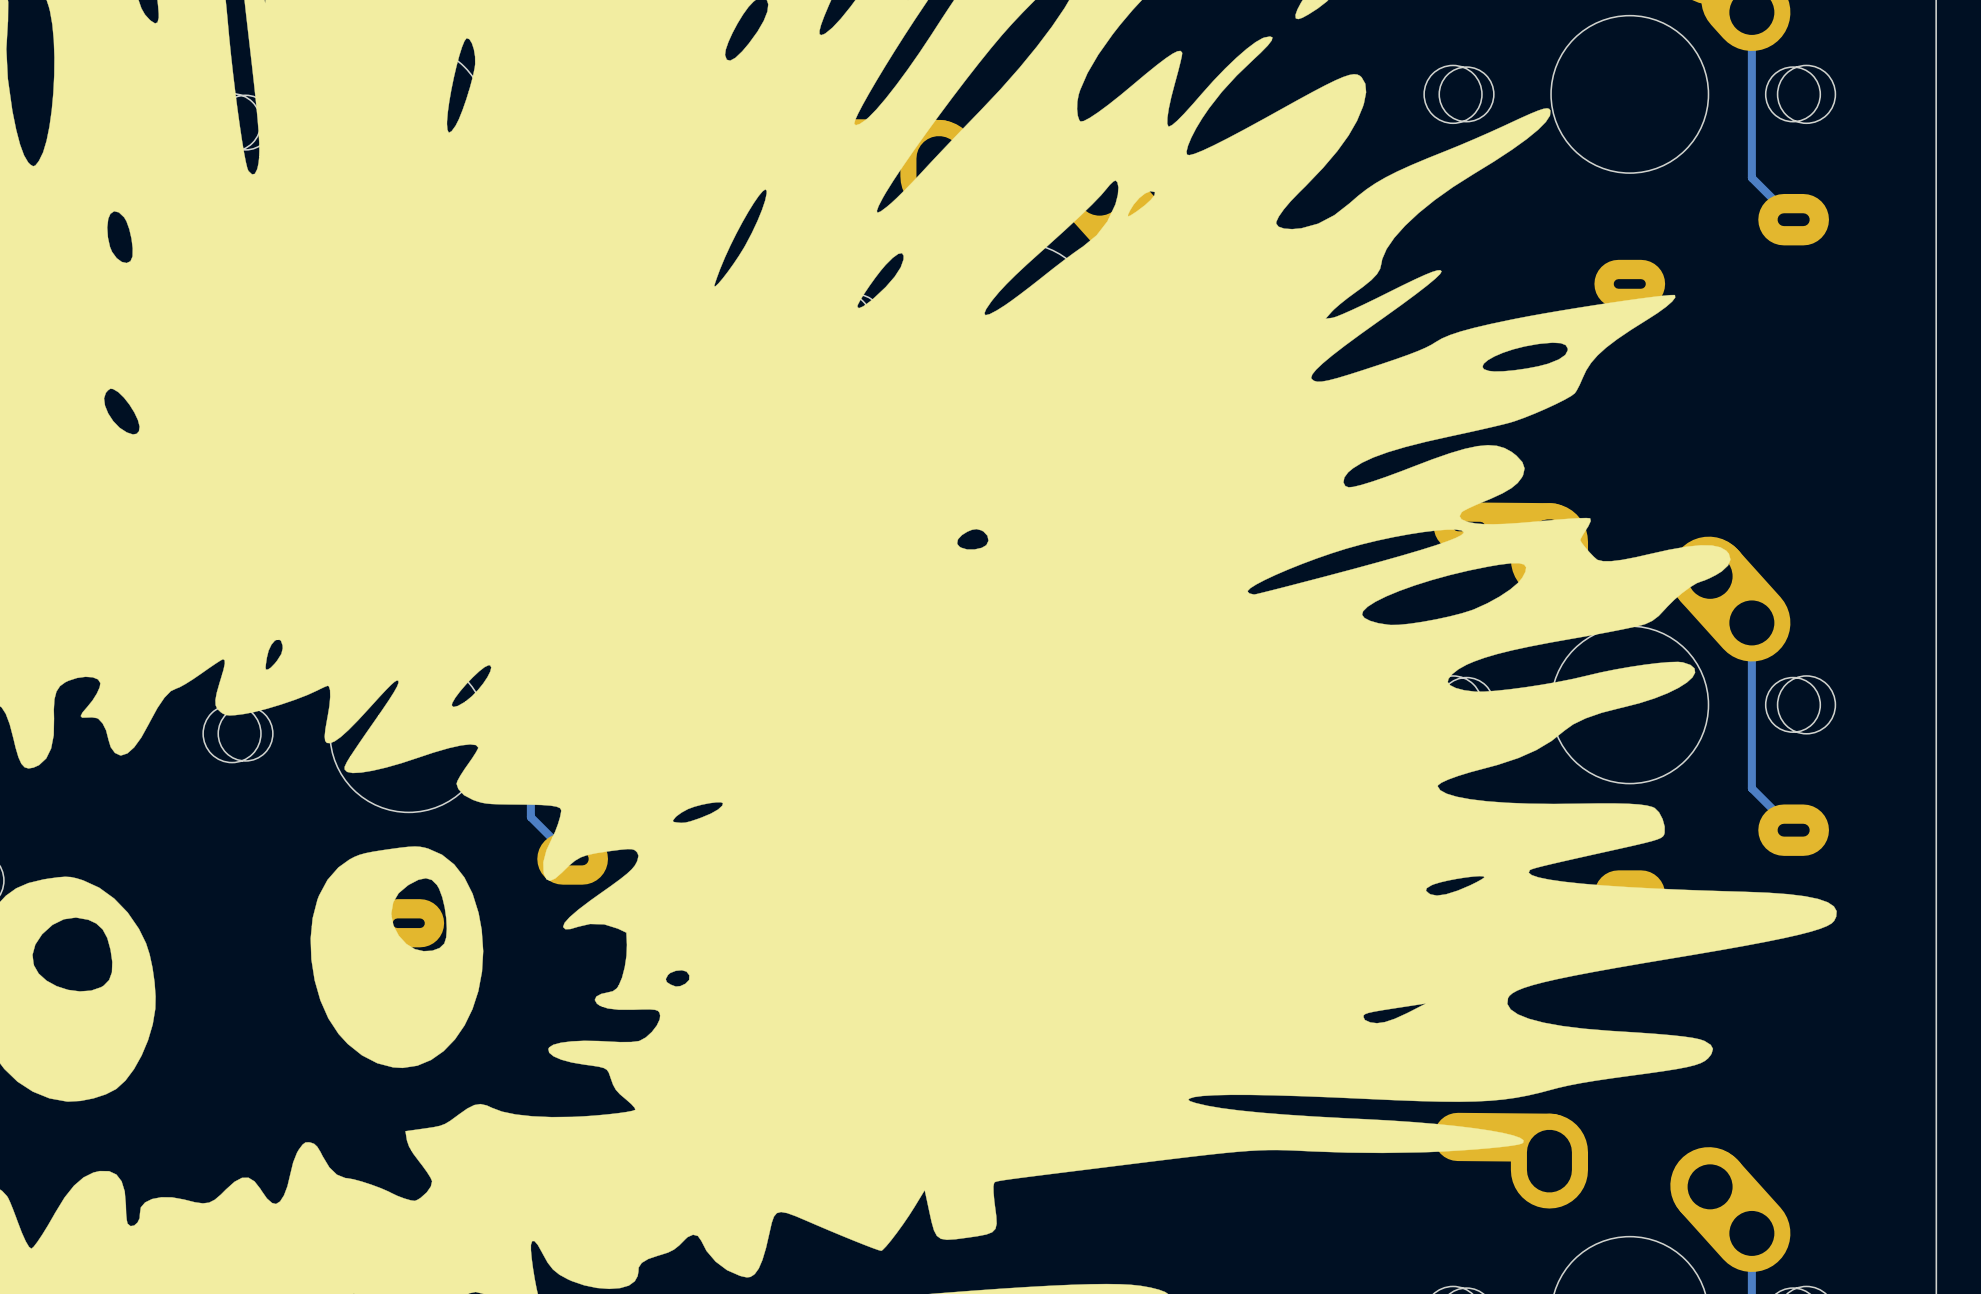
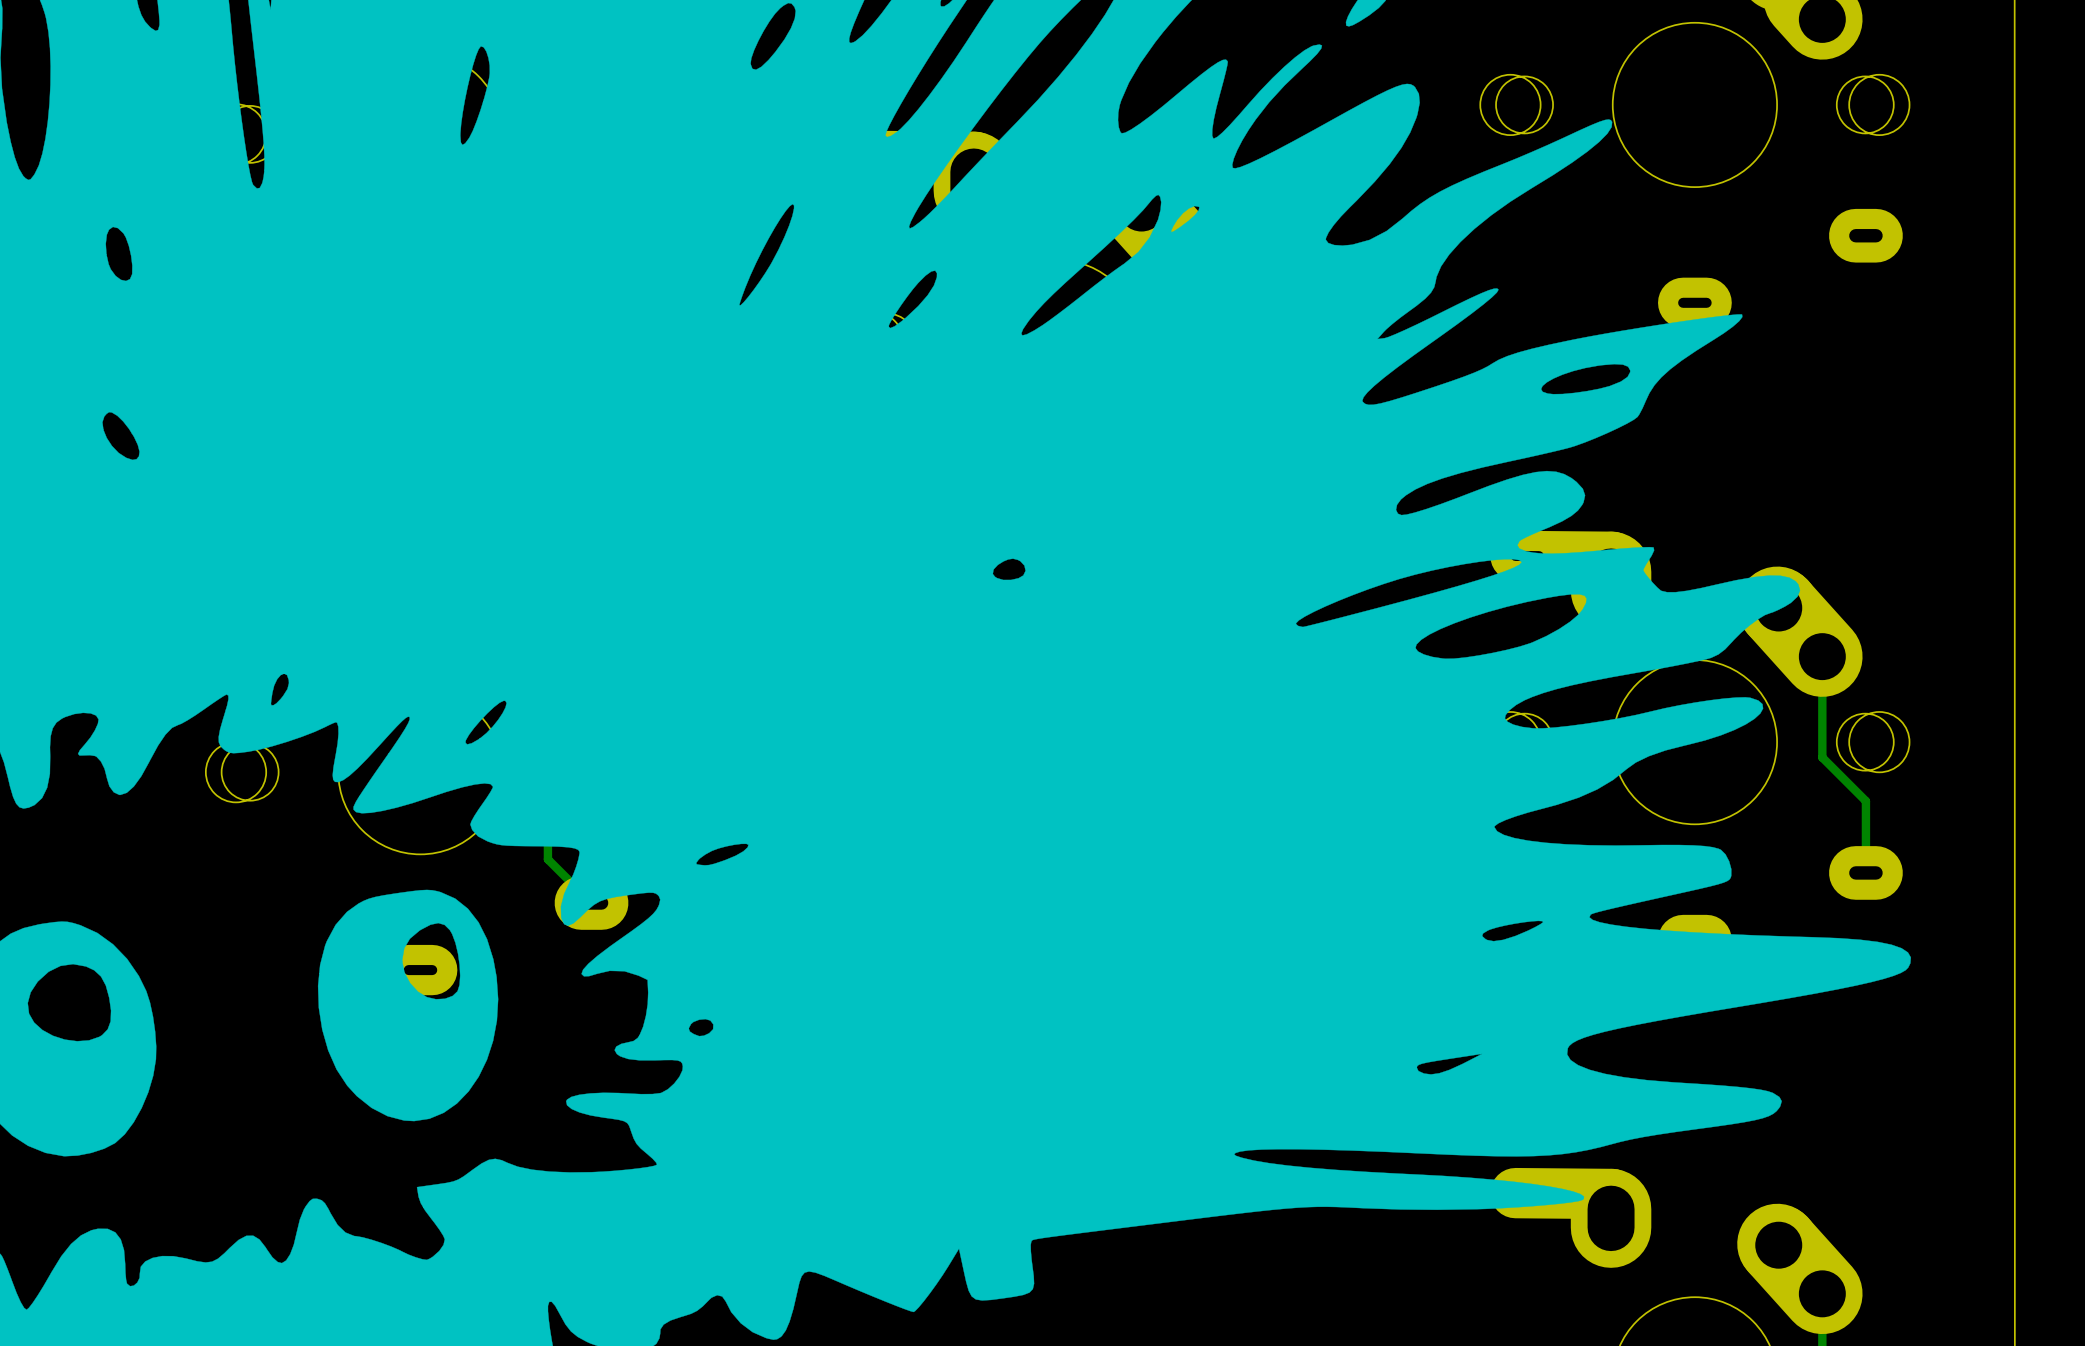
track: (1751, 12) (1751, 177) (1793, 219) -> none
track: (1751, 719) (1751, 788) (1793, 830) -> (1822, 757) (1865, 801) (1865, 872)

